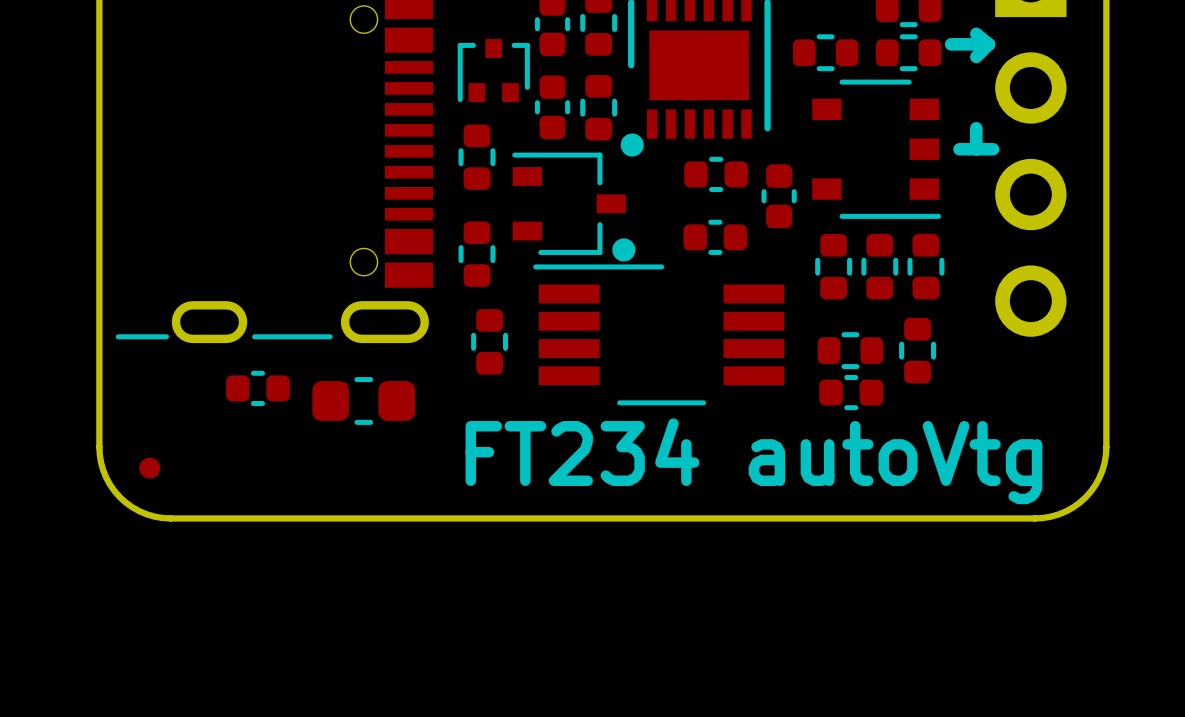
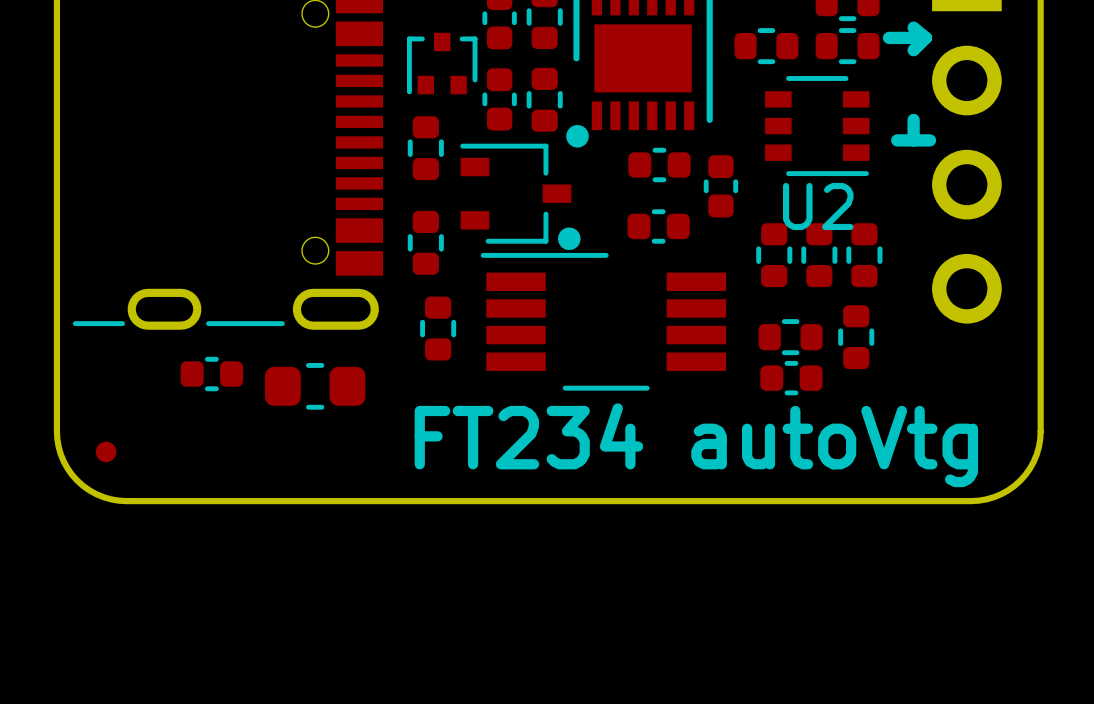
U2: none -> (817, 126)
part: (876, 149) -> none

